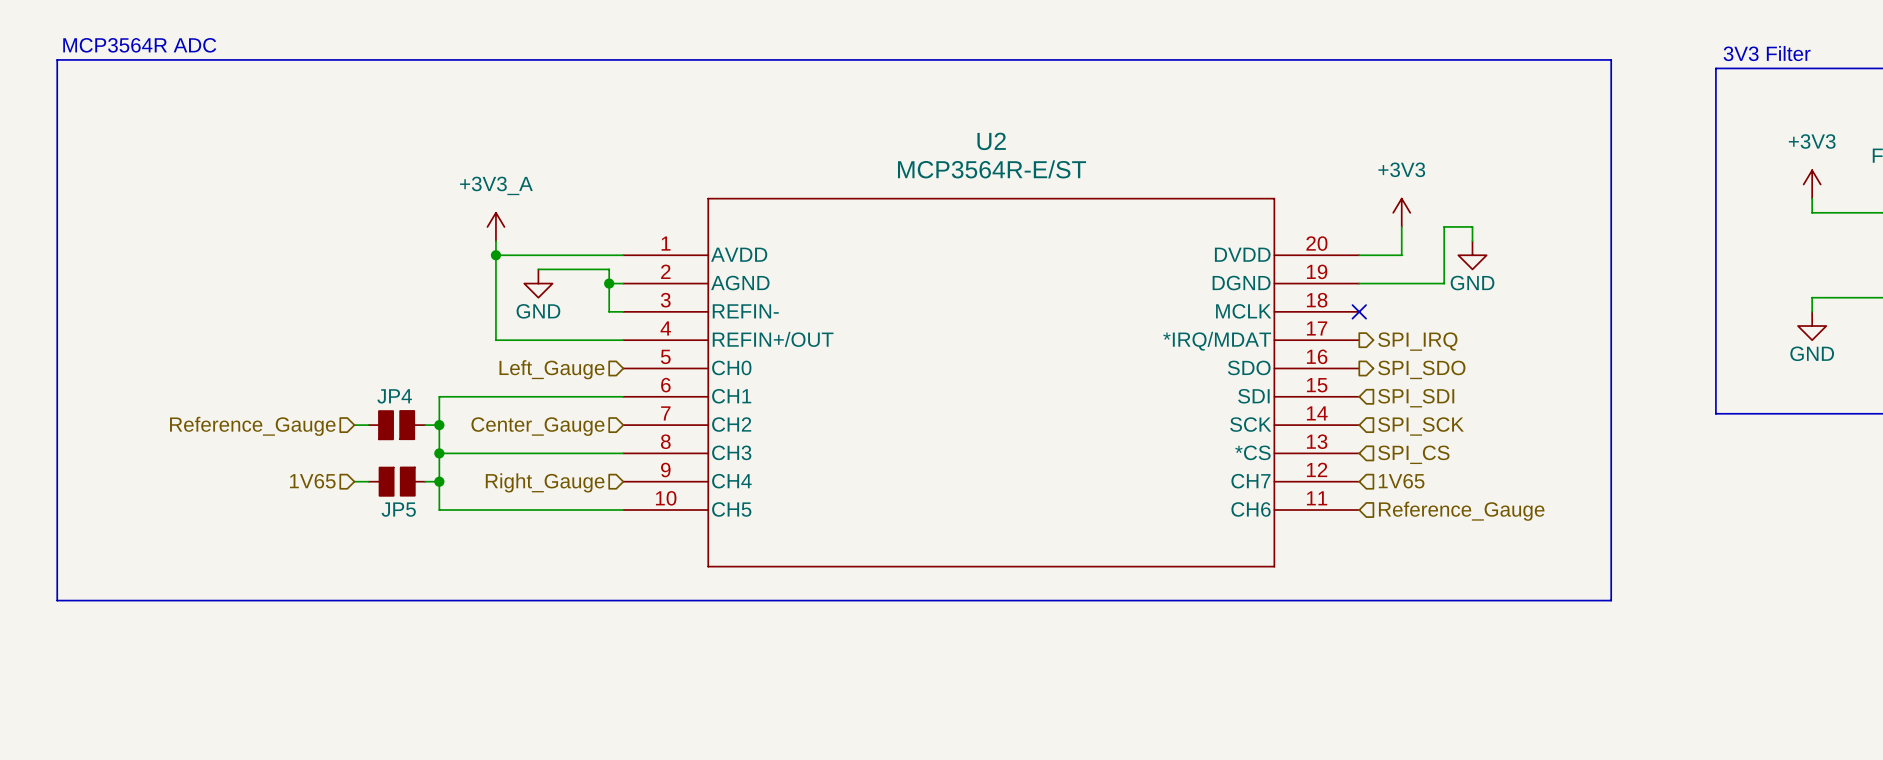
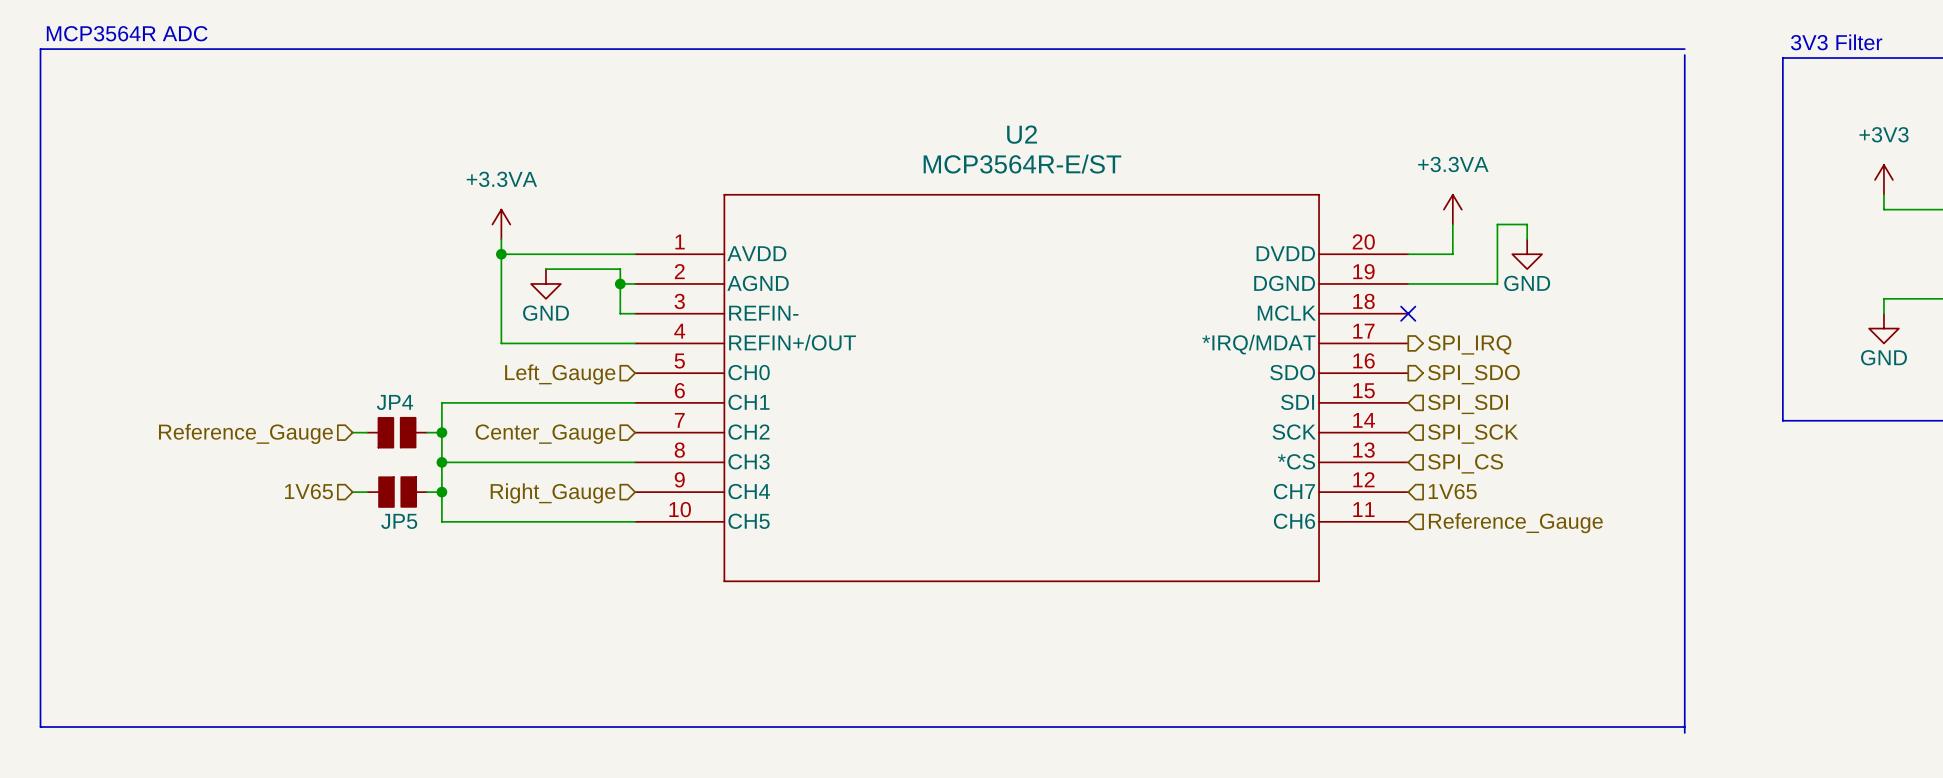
line: (1611, 59) (1611, 600) (57, 600) -> (1684, 727) (40, 727) (40, 616)
line: none -> (1672, 49) (1684, 49)
line: none -> (1684, 55) (1684, 732)
power symbol: +3V3 (1401, 212) -> +3.3VA (1452, 209)
power symbol: +3V3_A (495, 226) -> +3.3VA (501, 224)

